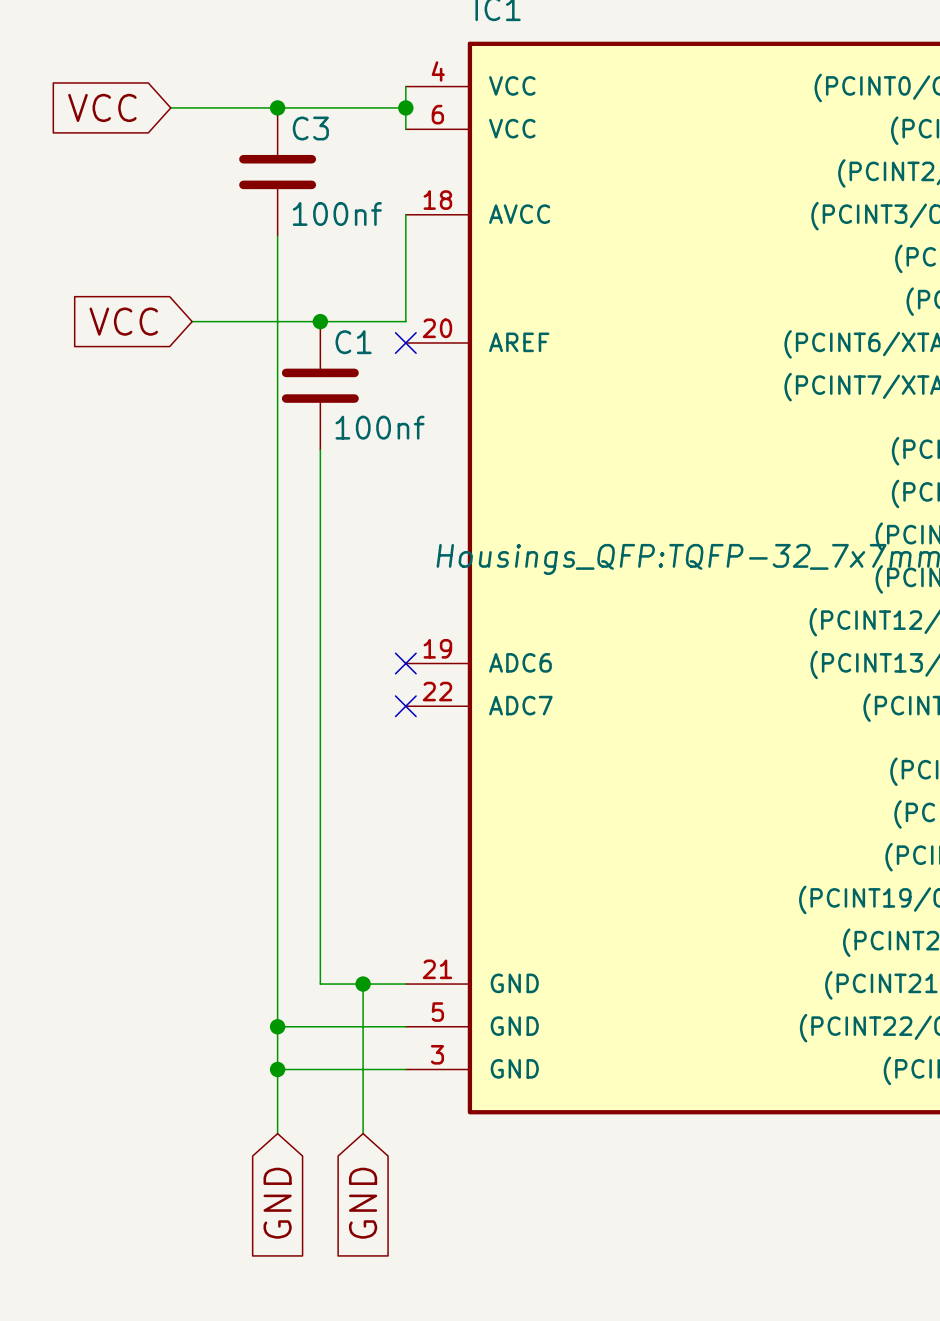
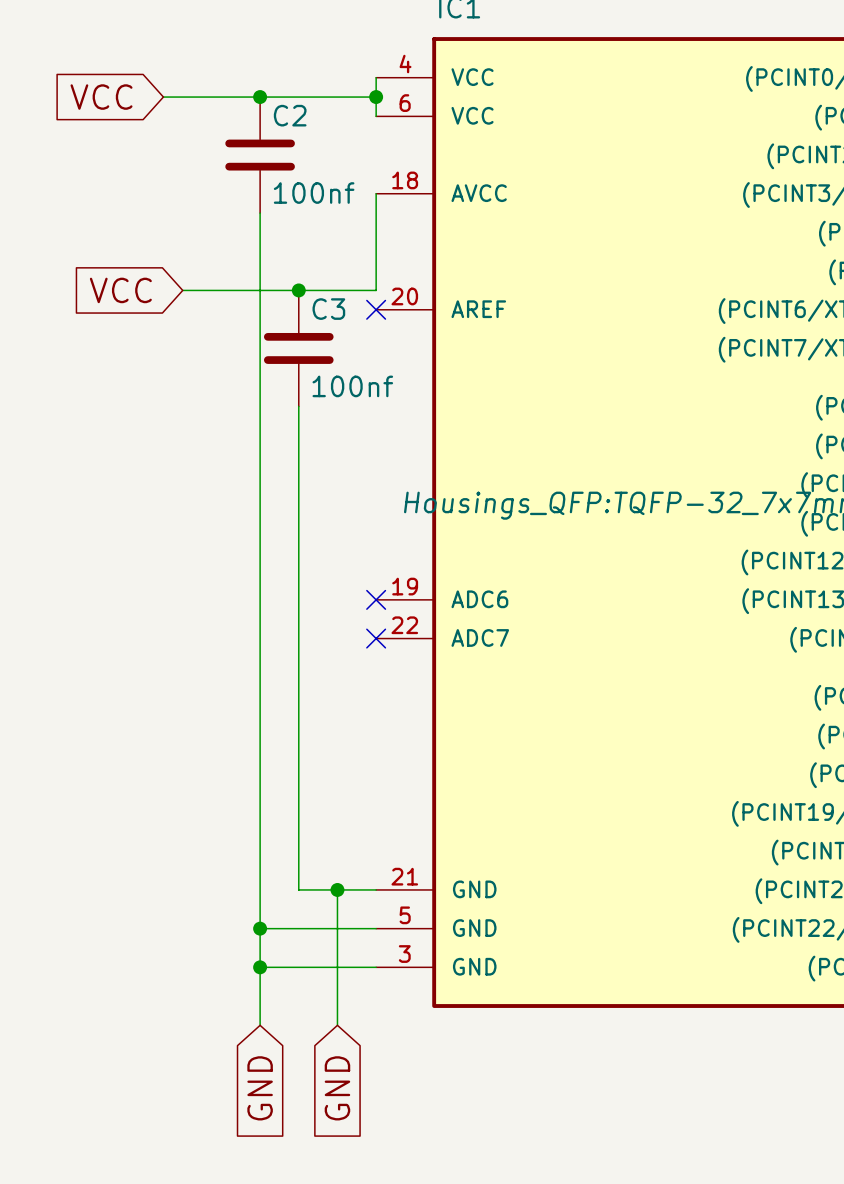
C3 name: C3 (310, 128) -> C2 (290, 115)
C1 name: C1 (353, 342) -> C3 (328, 309)

